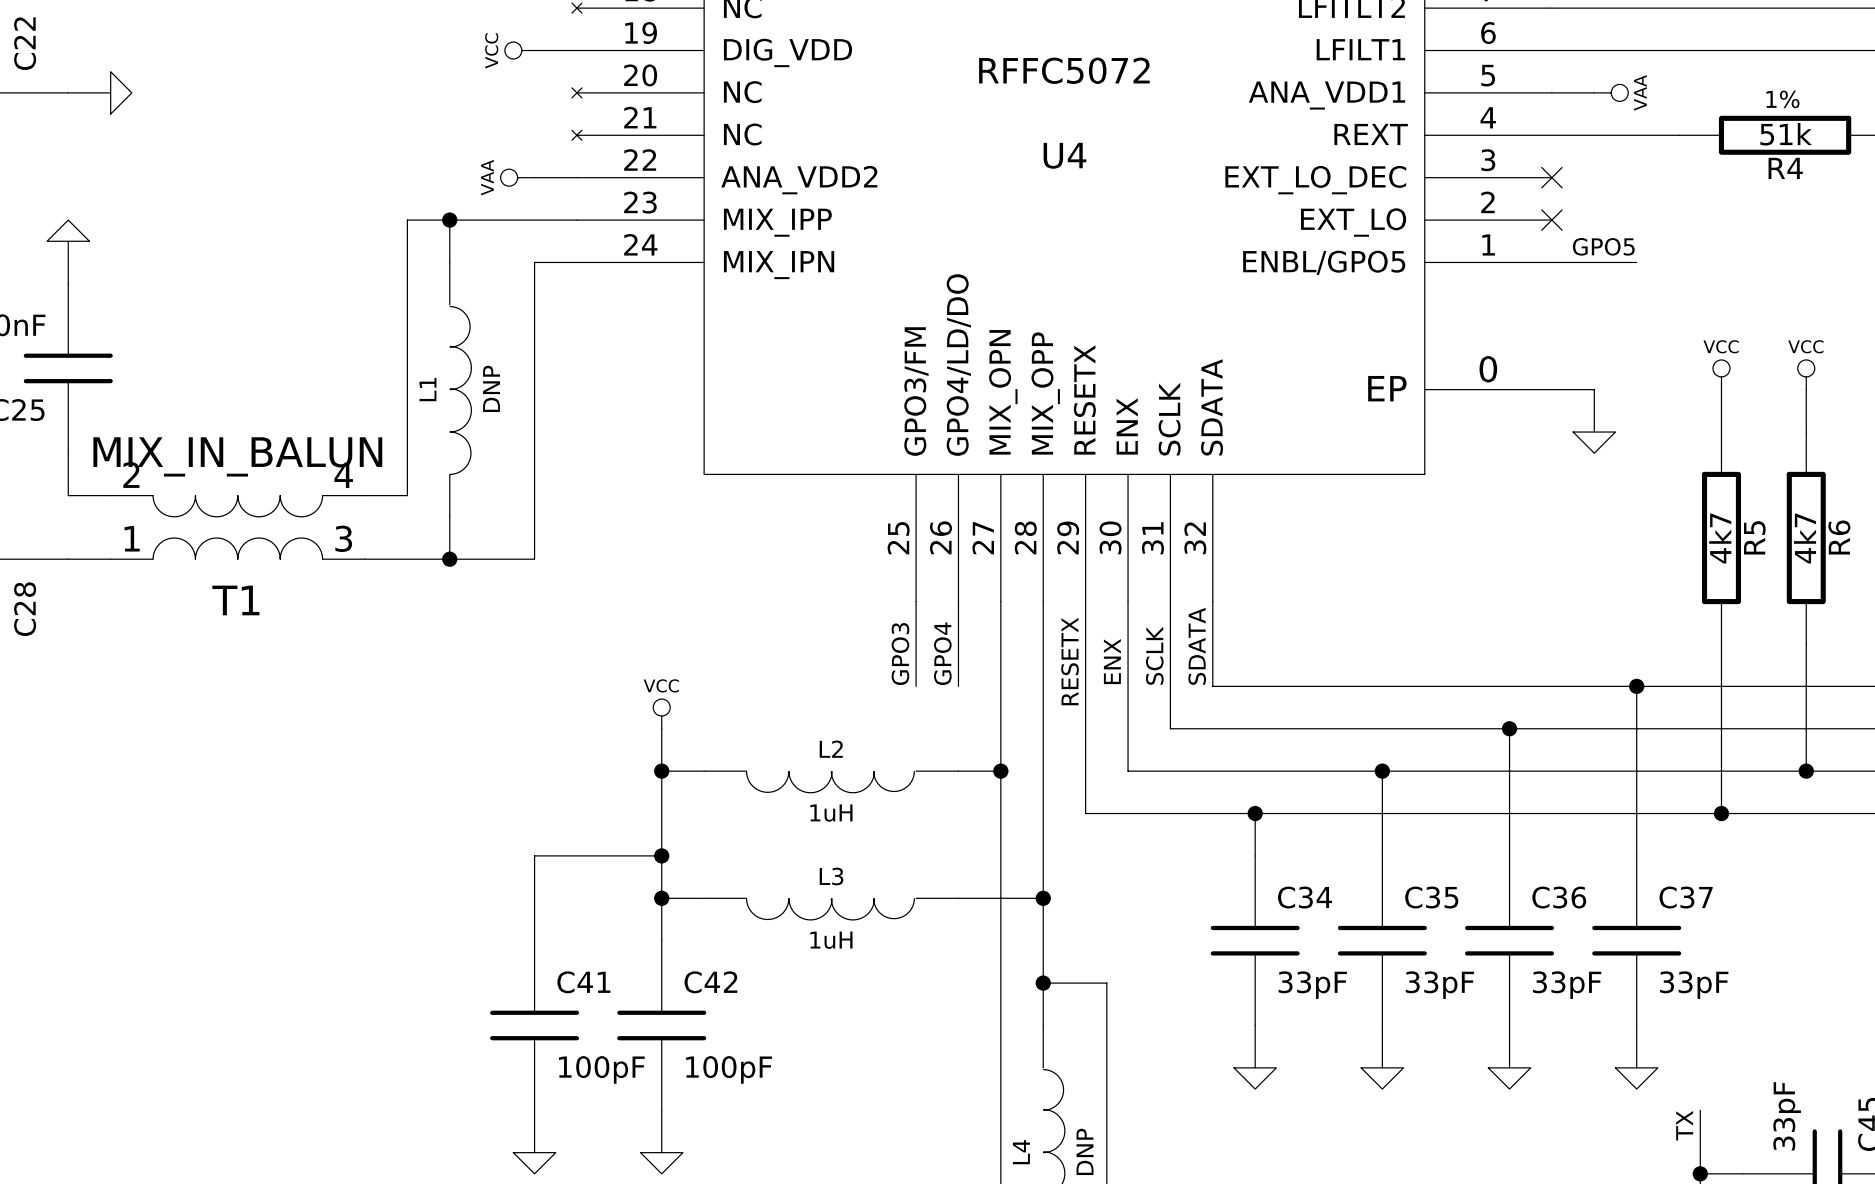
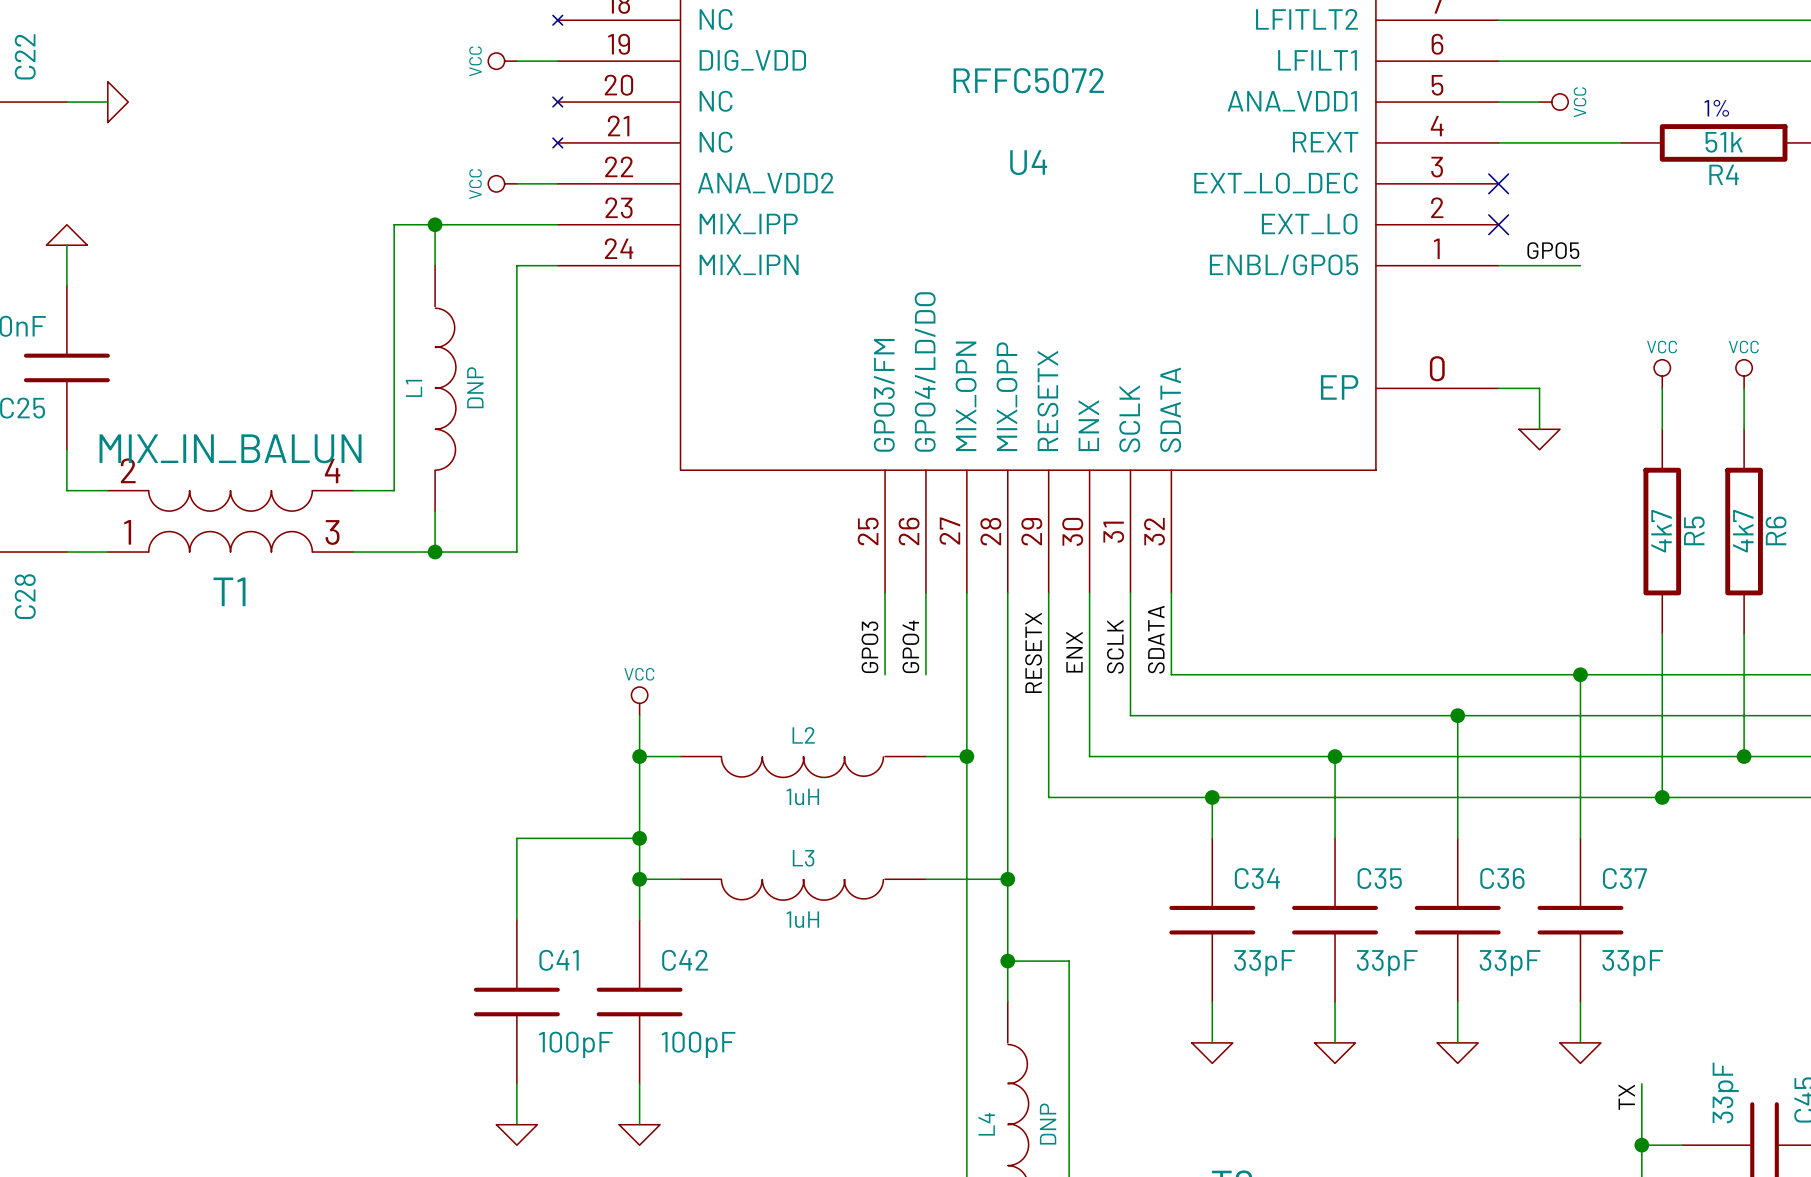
power symbol: VAA (1611, 92) -> VCC (1553, 102)
power symbol: VAA (517, 177) -> VCC (502, 183)

